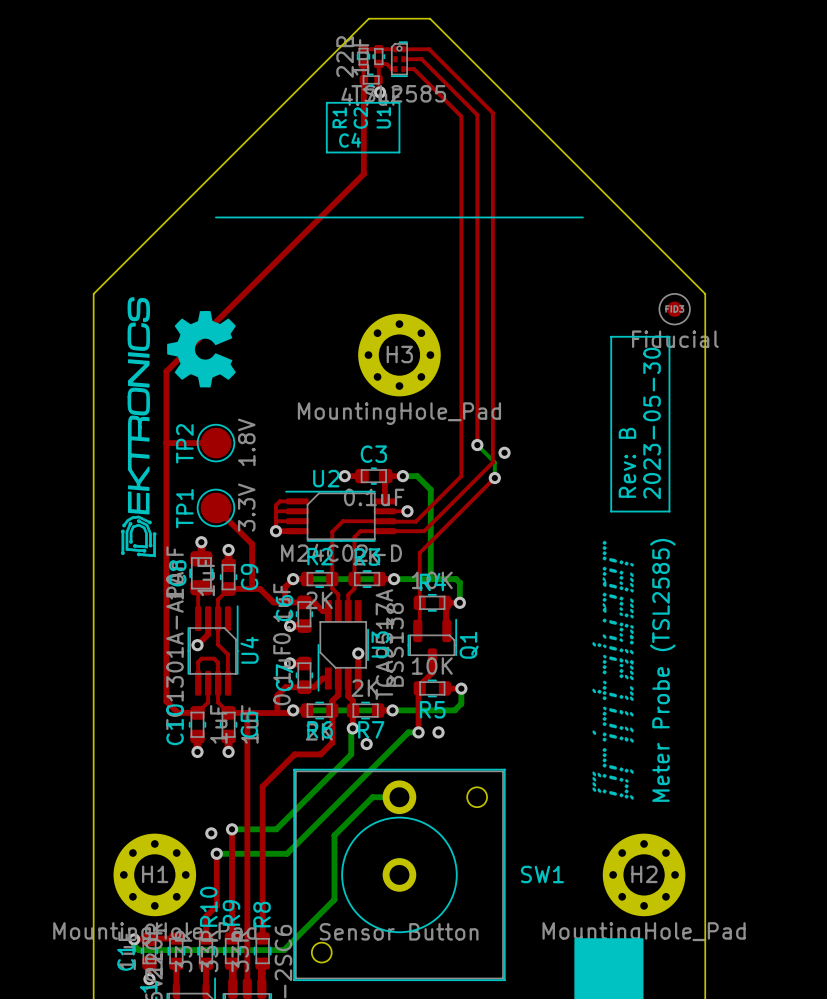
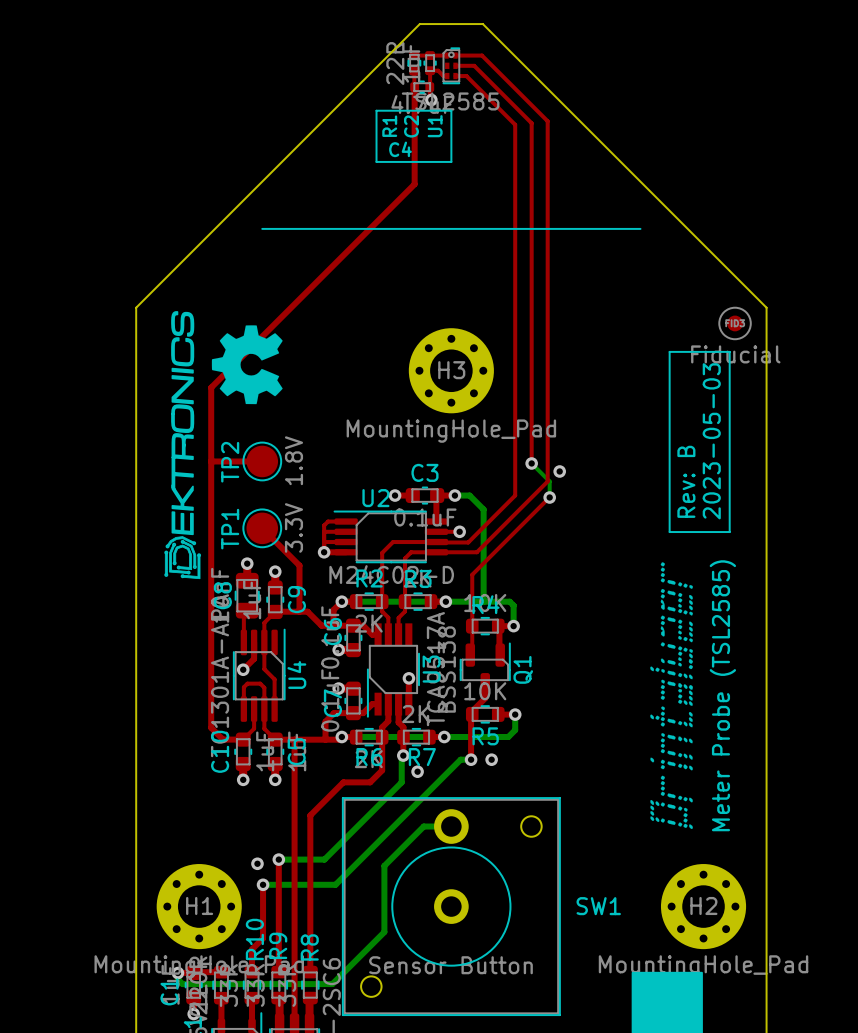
text: 2023-05-30 (652, 423) -> 2023-05-03 (711, 441)

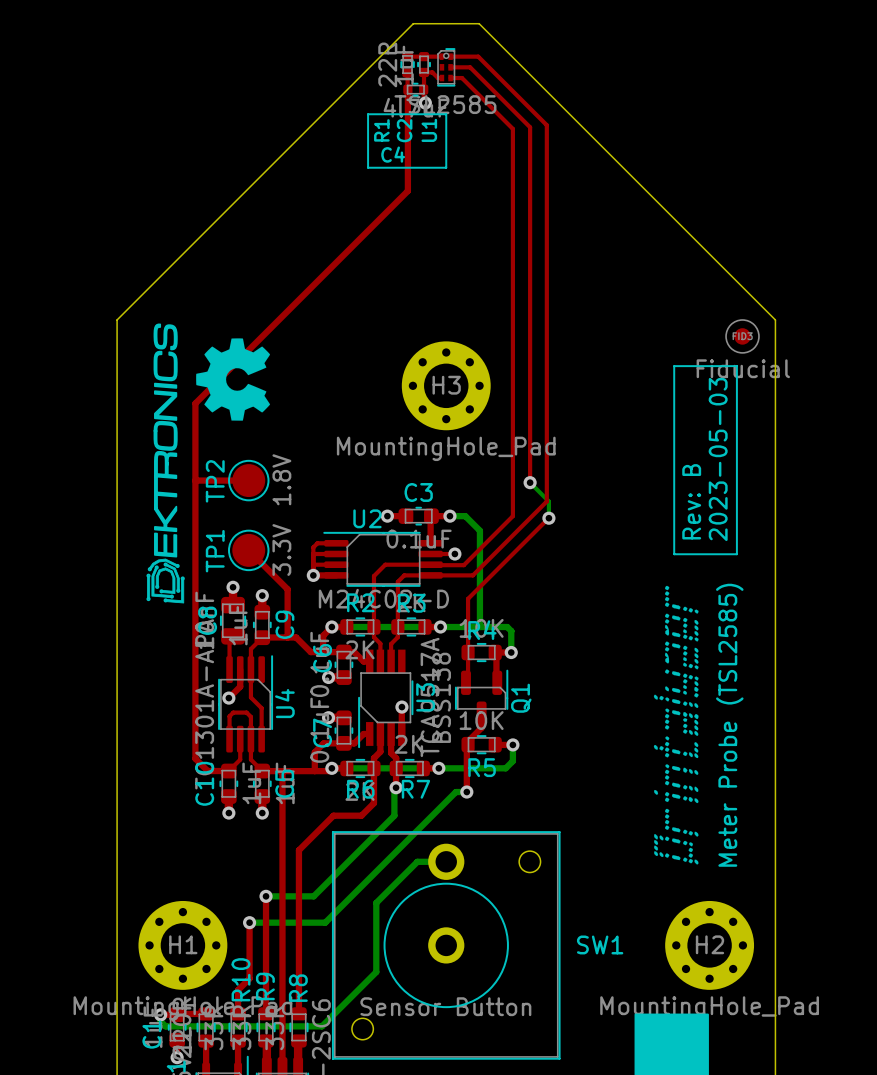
line: (262, 228) (640, 228) -> none
via: (559, 471) -> none
via: (491, 759) -> none
via: (417, 771) -> none
via: (257, 863) -> none

